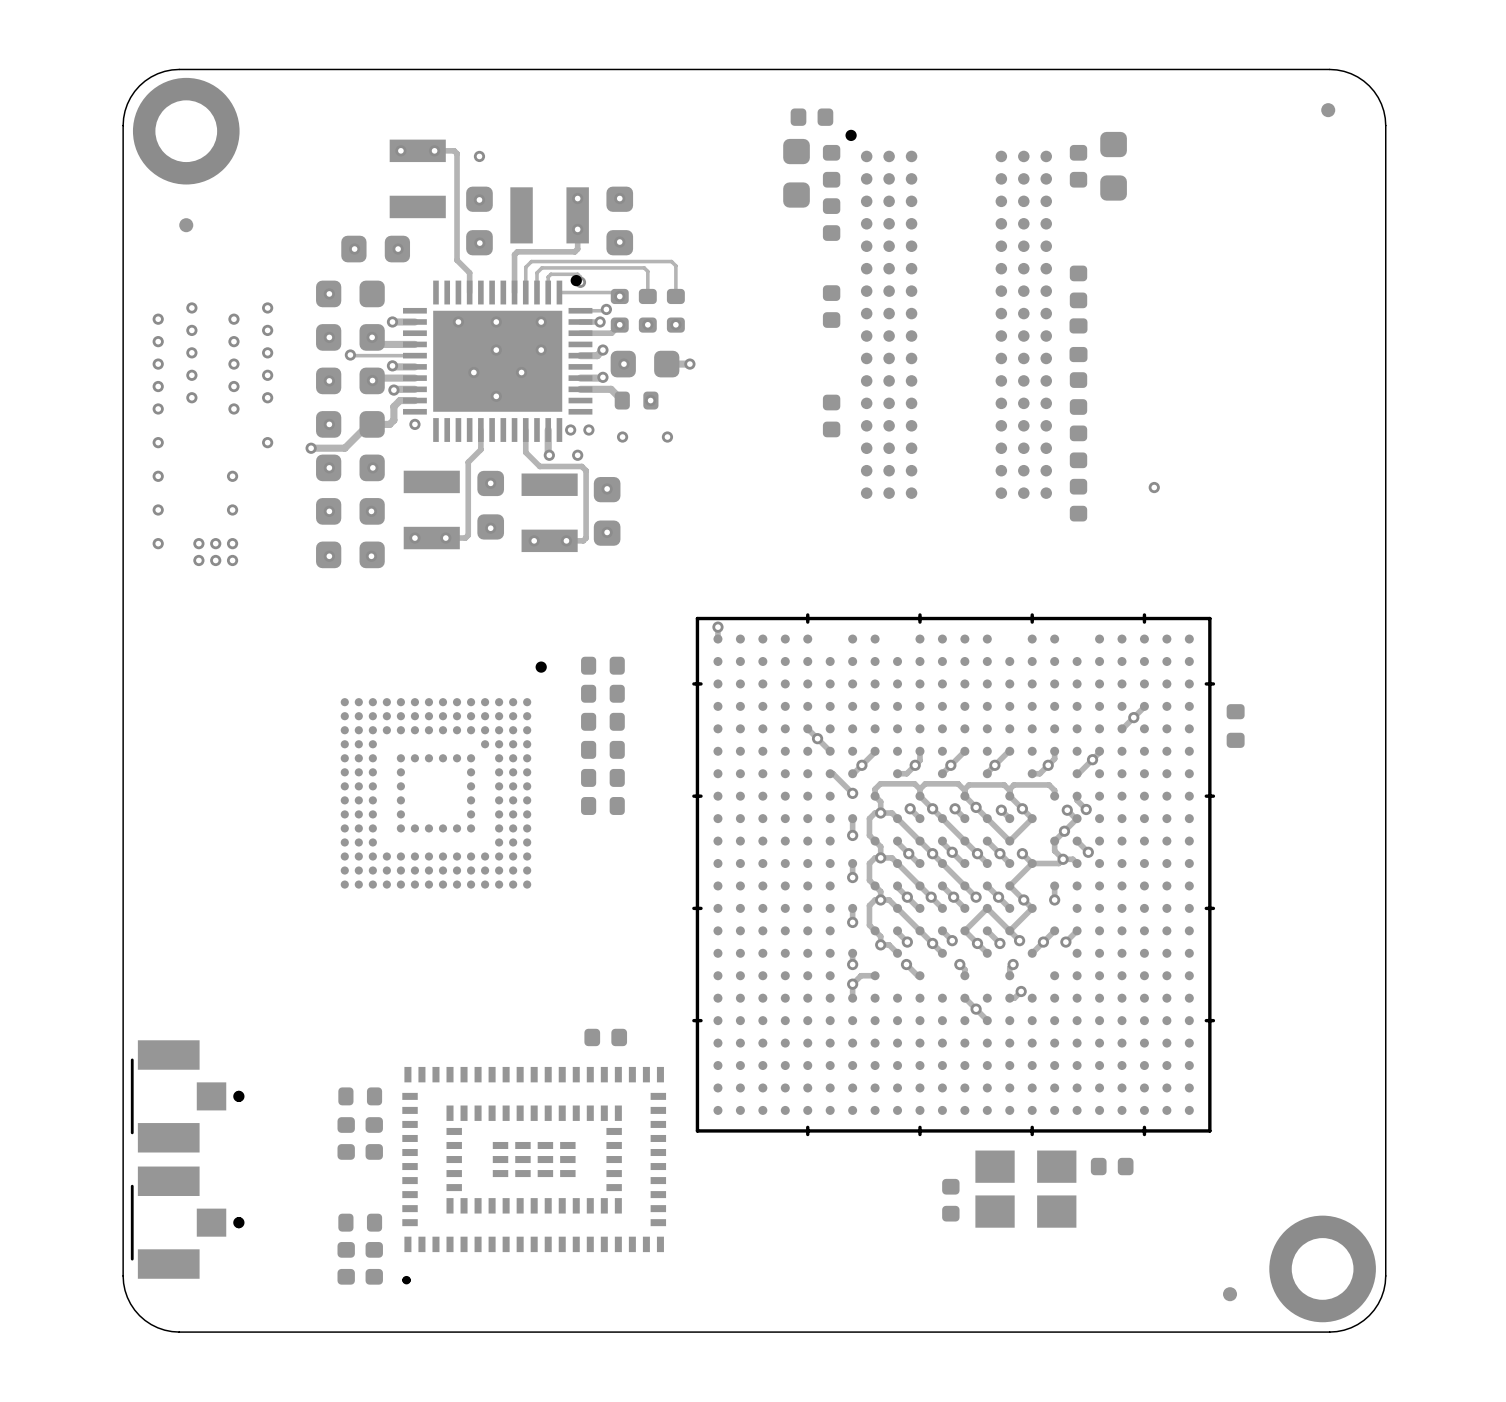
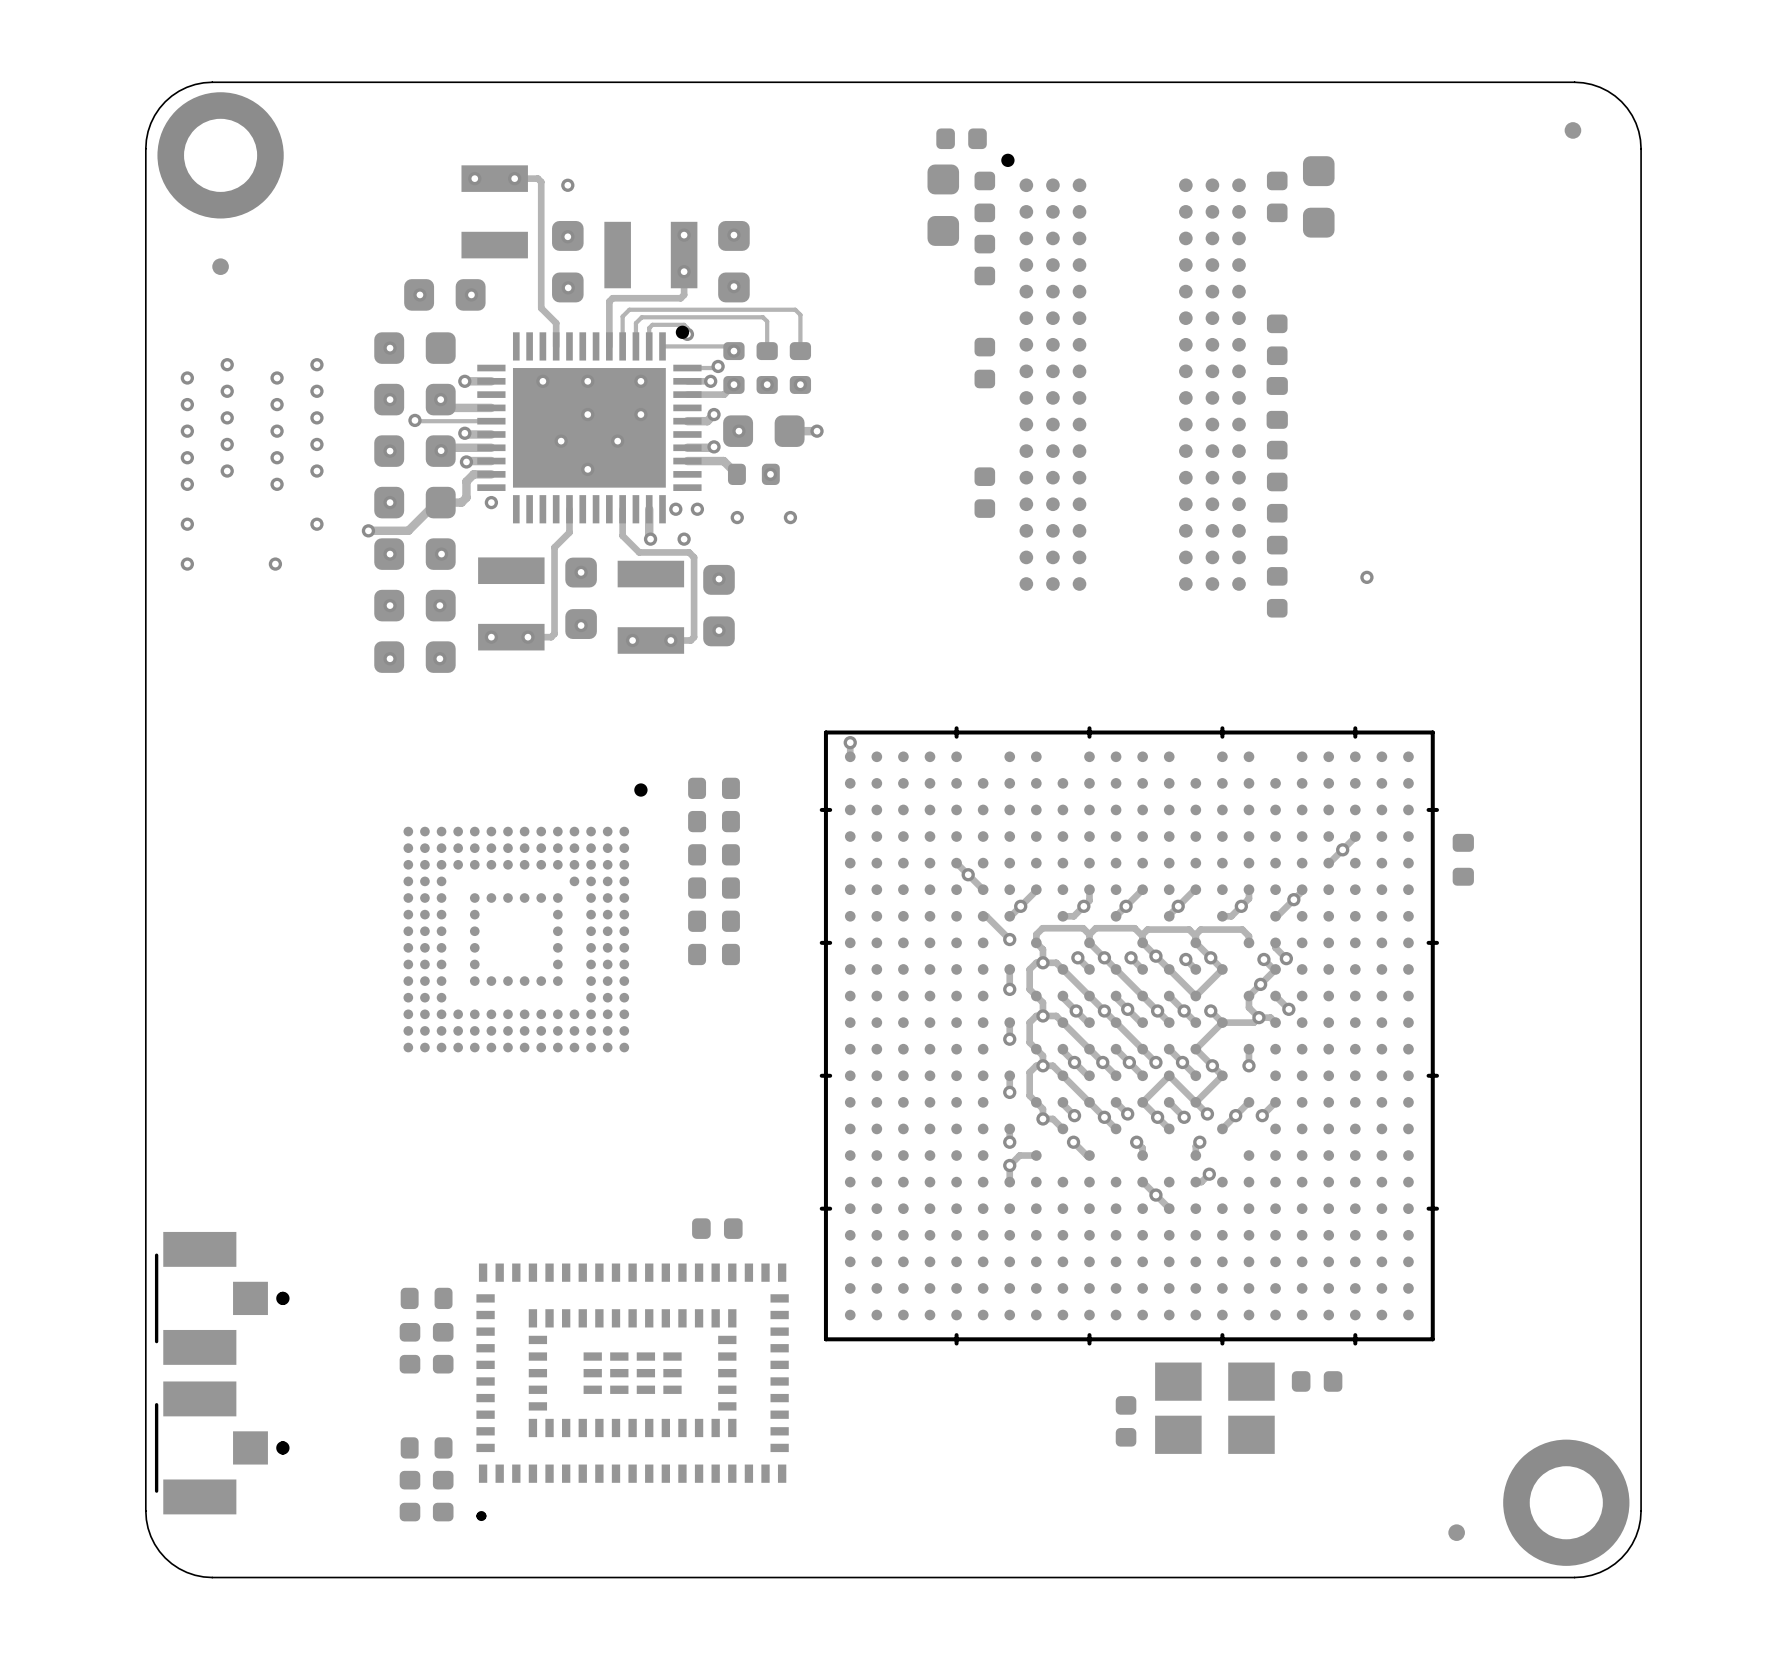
via: (158, 509) -> none
via: (232, 509) -> none
via: (158, 543) -> none
via: (198, 543) -> none
via: (215, 543) -> none
via: (232, 543) -> none
via: (198, 560) -> none
via: (215, 560) -> none
via: (232, 560) -> none

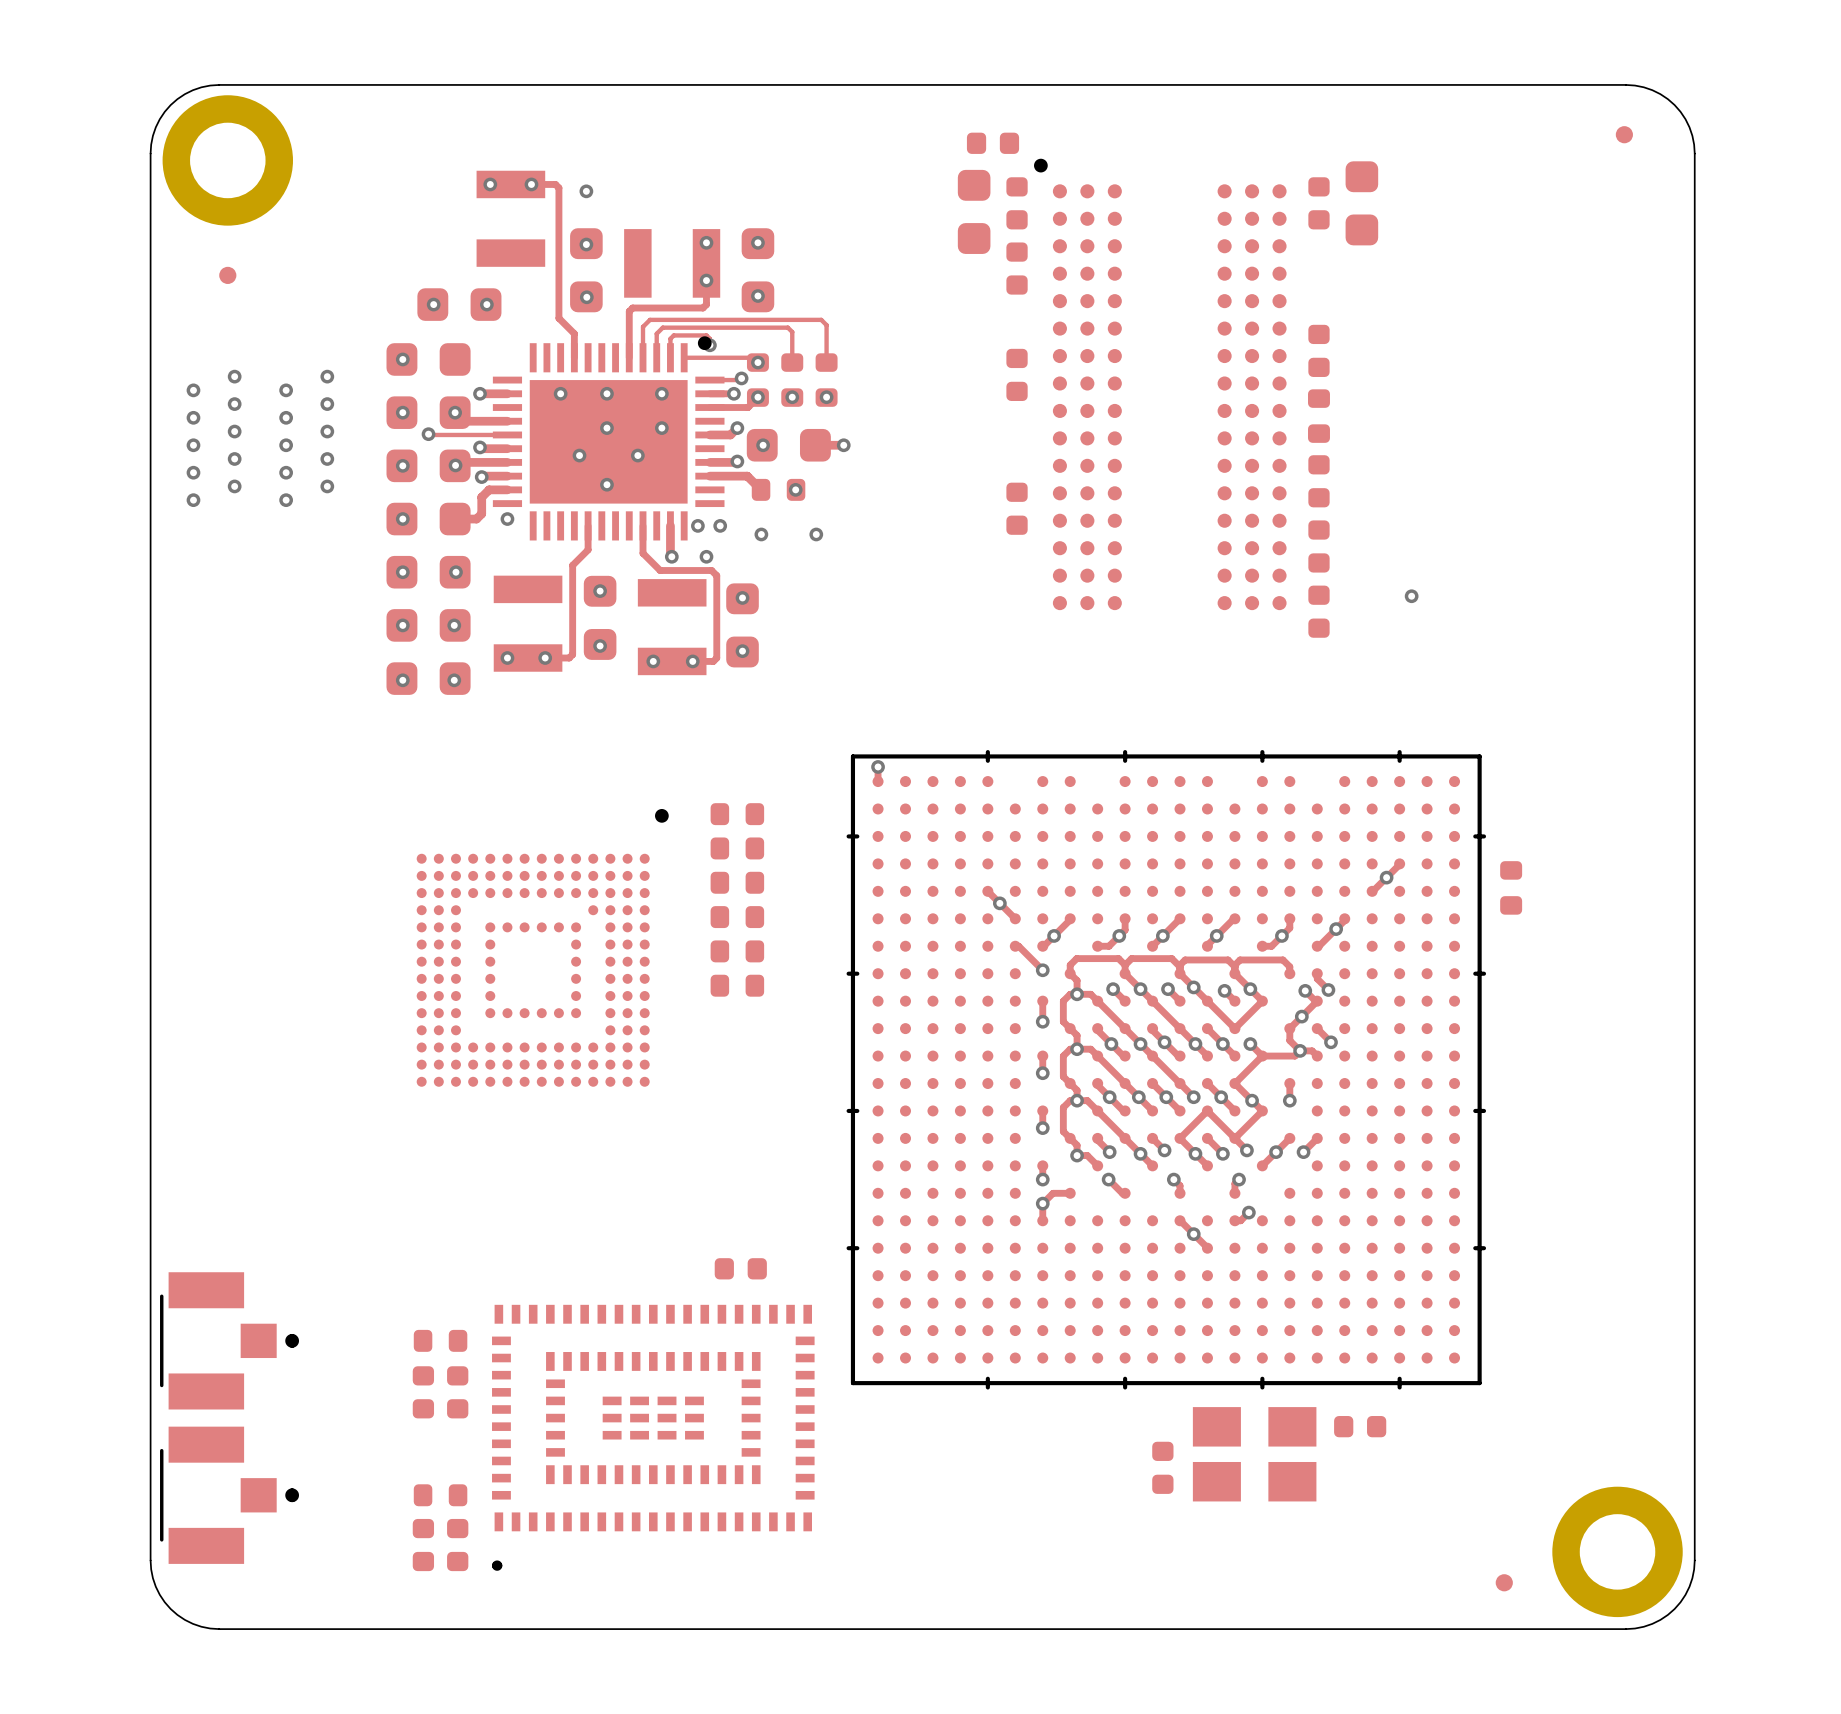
track: (440, 502) (436, 502) (408, 530) (368, 530) -> none
via: (187, 524) -> none
via: (316, 524) -> none
via: (368, 530) -> none
via: (187, 564) -> none
via: (275, 564) -> none

